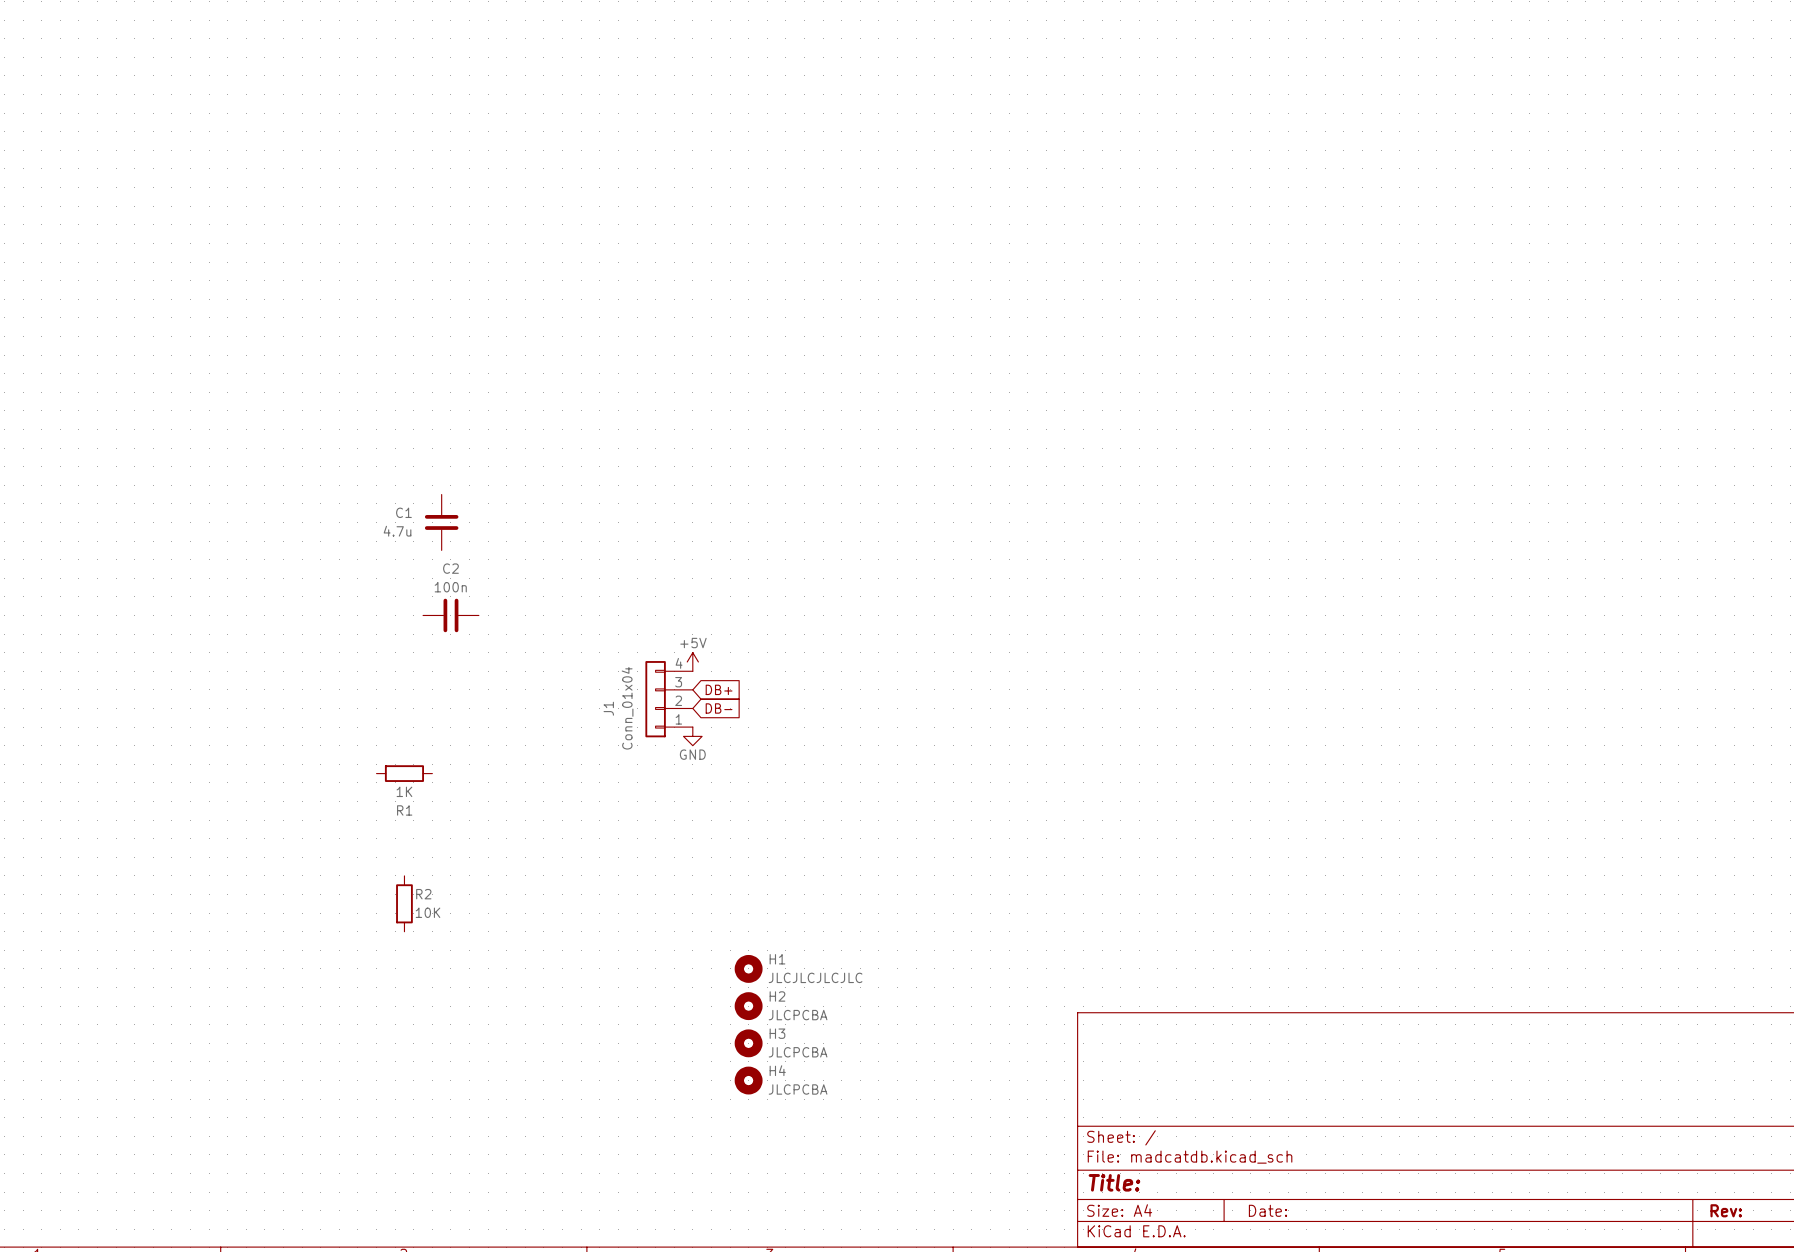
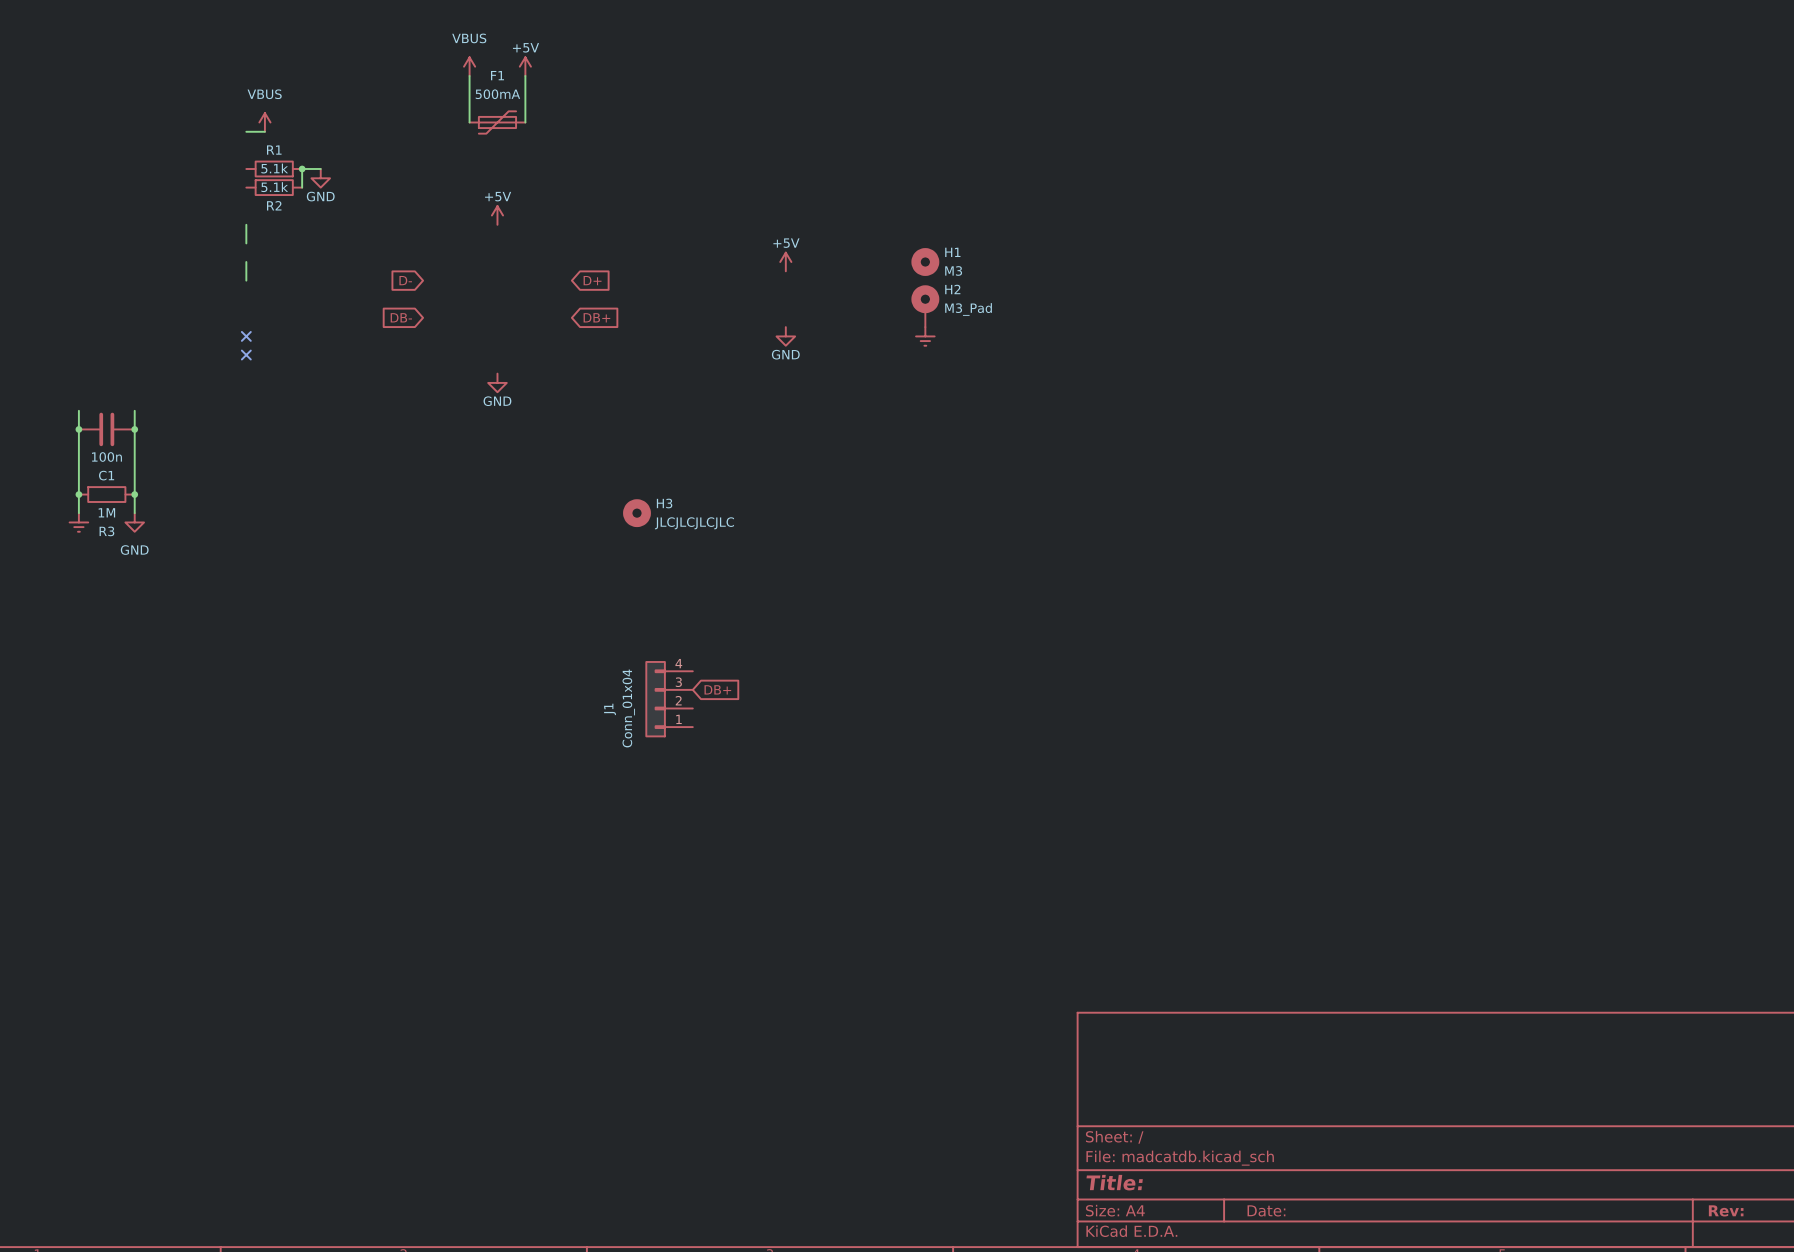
power symbol: none -> VBUS (469, 66)
power symbol: none -> +5V (525, 66)
wire: none -> (469, 75) (469, 122)
wire: none -> (525, 75) (525, 122)
power symbol: none -> VBUS (264, 122)
F1: none -> 500mA (497, 122)
wire: none -> (246, 131) (264, 131)
junction: none -> (302, 168)
wire: none -> (320, 168) (302, 168) (302, 187)
power symbol: none -> GND (320, 178)
power symbol: none -> +5V (497, 215)
wire: none -> (246, 224) (246, 243)
wire: none -> (246, 262) (246, 280)
power symbol: none -> +5V (785, 262)
global label: none -> D- (405, 280)
global label: none -> D+ (592, 280)
global label: none -> DB- (401, 317)
global label: none -> DB+ (596, 317)
no-connect mark: none -> (246, 336)
power symbol: none -> GND (785, 336)
power symbol: none -> (925, 336)
no-connect mark: none -> (246, 355)
power symbol: none -> GND (497, 382)
wire: none -> (78, 410) (78, 513)
wire: none -> (134, 410) (134, 513)
junction: none -> (78, 429)
junction: none -> (134, 429)
junction: none -> (78, 494)
R3: none -> 1M (106, 494)
junction: none -> (134, 494)
C1 name position: C1 (403, 512) -> C1 (106, 475)
power symbol: none -> (78, 522)
power symbol: none -> GND (134, 522)
C1 rotation: 0° (441, 522) -> 90° clockwise (106, 429)
C1 position: (441, 522) -> (106, 429)
C1 value: 4.7u (397, 531) -> 100n (106, 457)
C2: 100n (450, 615) -> none
power symbol: +5V (692, 661) -> none
global label: DB- (719, 708) -> none
power symbol: GND (692, 736) -> none
R1 position: (404, 773) -> (274, 168)
R1 value: 1K (404, 791) -> 5.1k (274, 168)
R1 name position: R1 (404, 810) -> R1 (274, 150)
R2 rotation: 0° (404, 903) -> 90° clockwise (274, 187)
R2 position: (404, 903) -> (274, 187)
R2 value: 10K (428, 912) -> 5.1k (274, 187)
H1 position: (748, 968) -> (925, 262)
H1 value: JLCJLCJLCJLC (815, 977) -> M3 (953, 270)
H2 symbol: [734, 992, 763, 1021] -> [911, 285, 940, 328]
H2 value: JLCPCBA (798, 1015) -> M3_Pad (968, 309)
H3 position: (748, 1043) -> (637, 513)
H3 value: JLCPCBA (798, 1052) -> JLCJLCJLCJLC (694, 523)
H4: JLCPCBA (748, 1080) -> none

